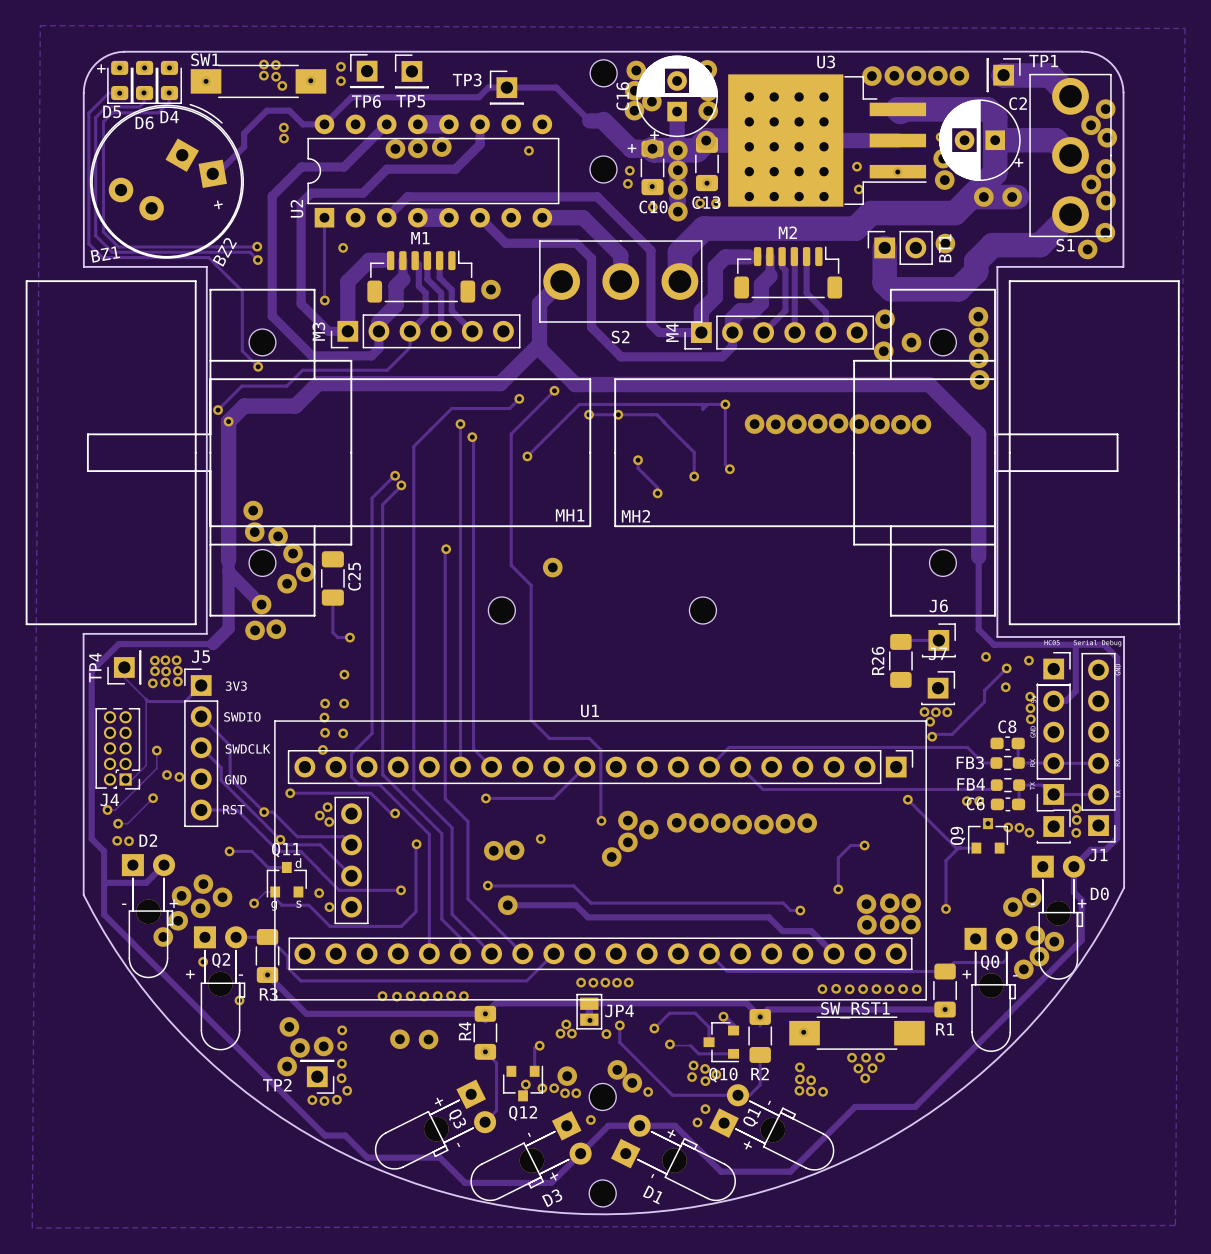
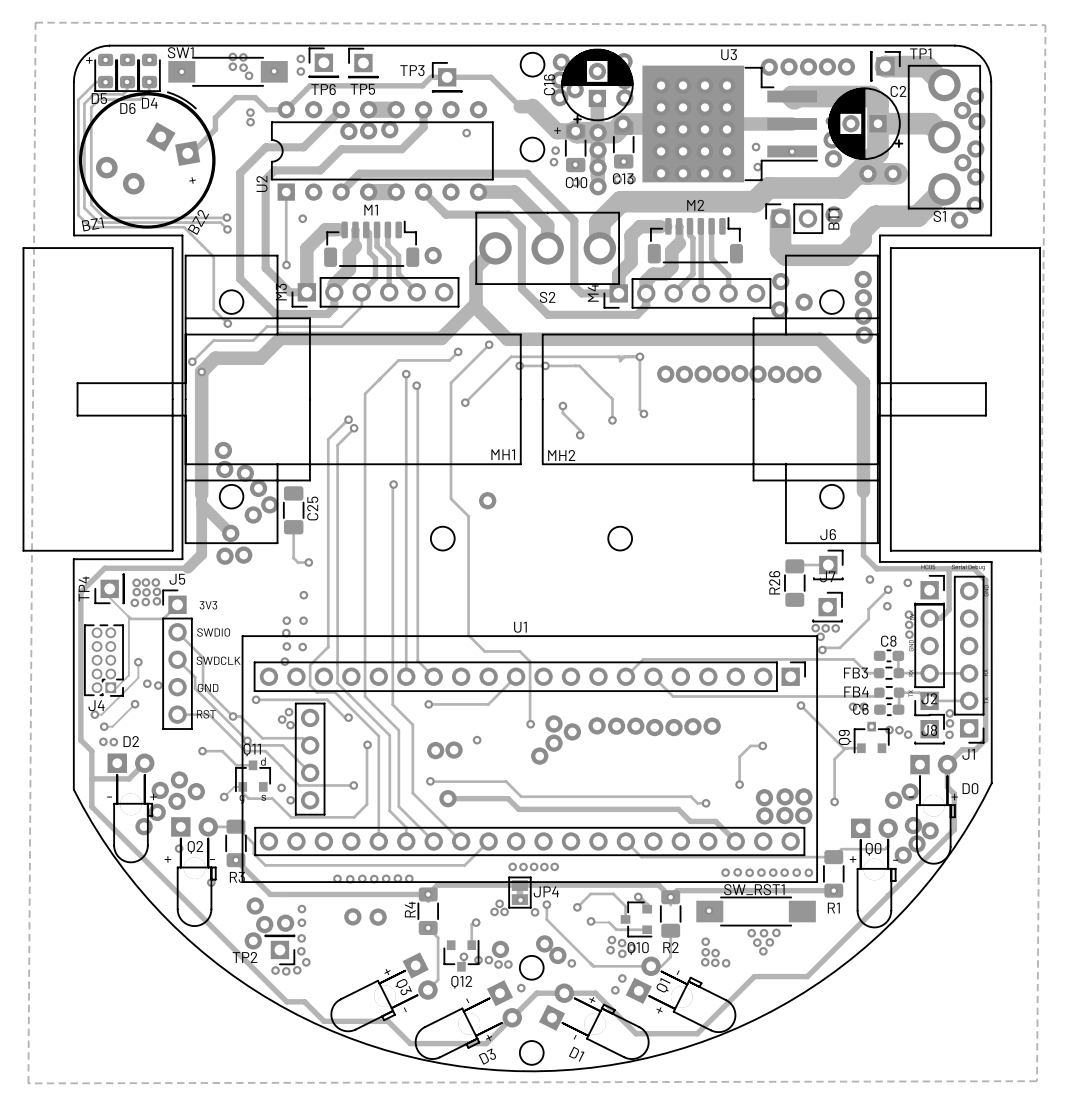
J2 name: none -> J2 (929, 698)
J8 name: none -> J8 (929, 730)

